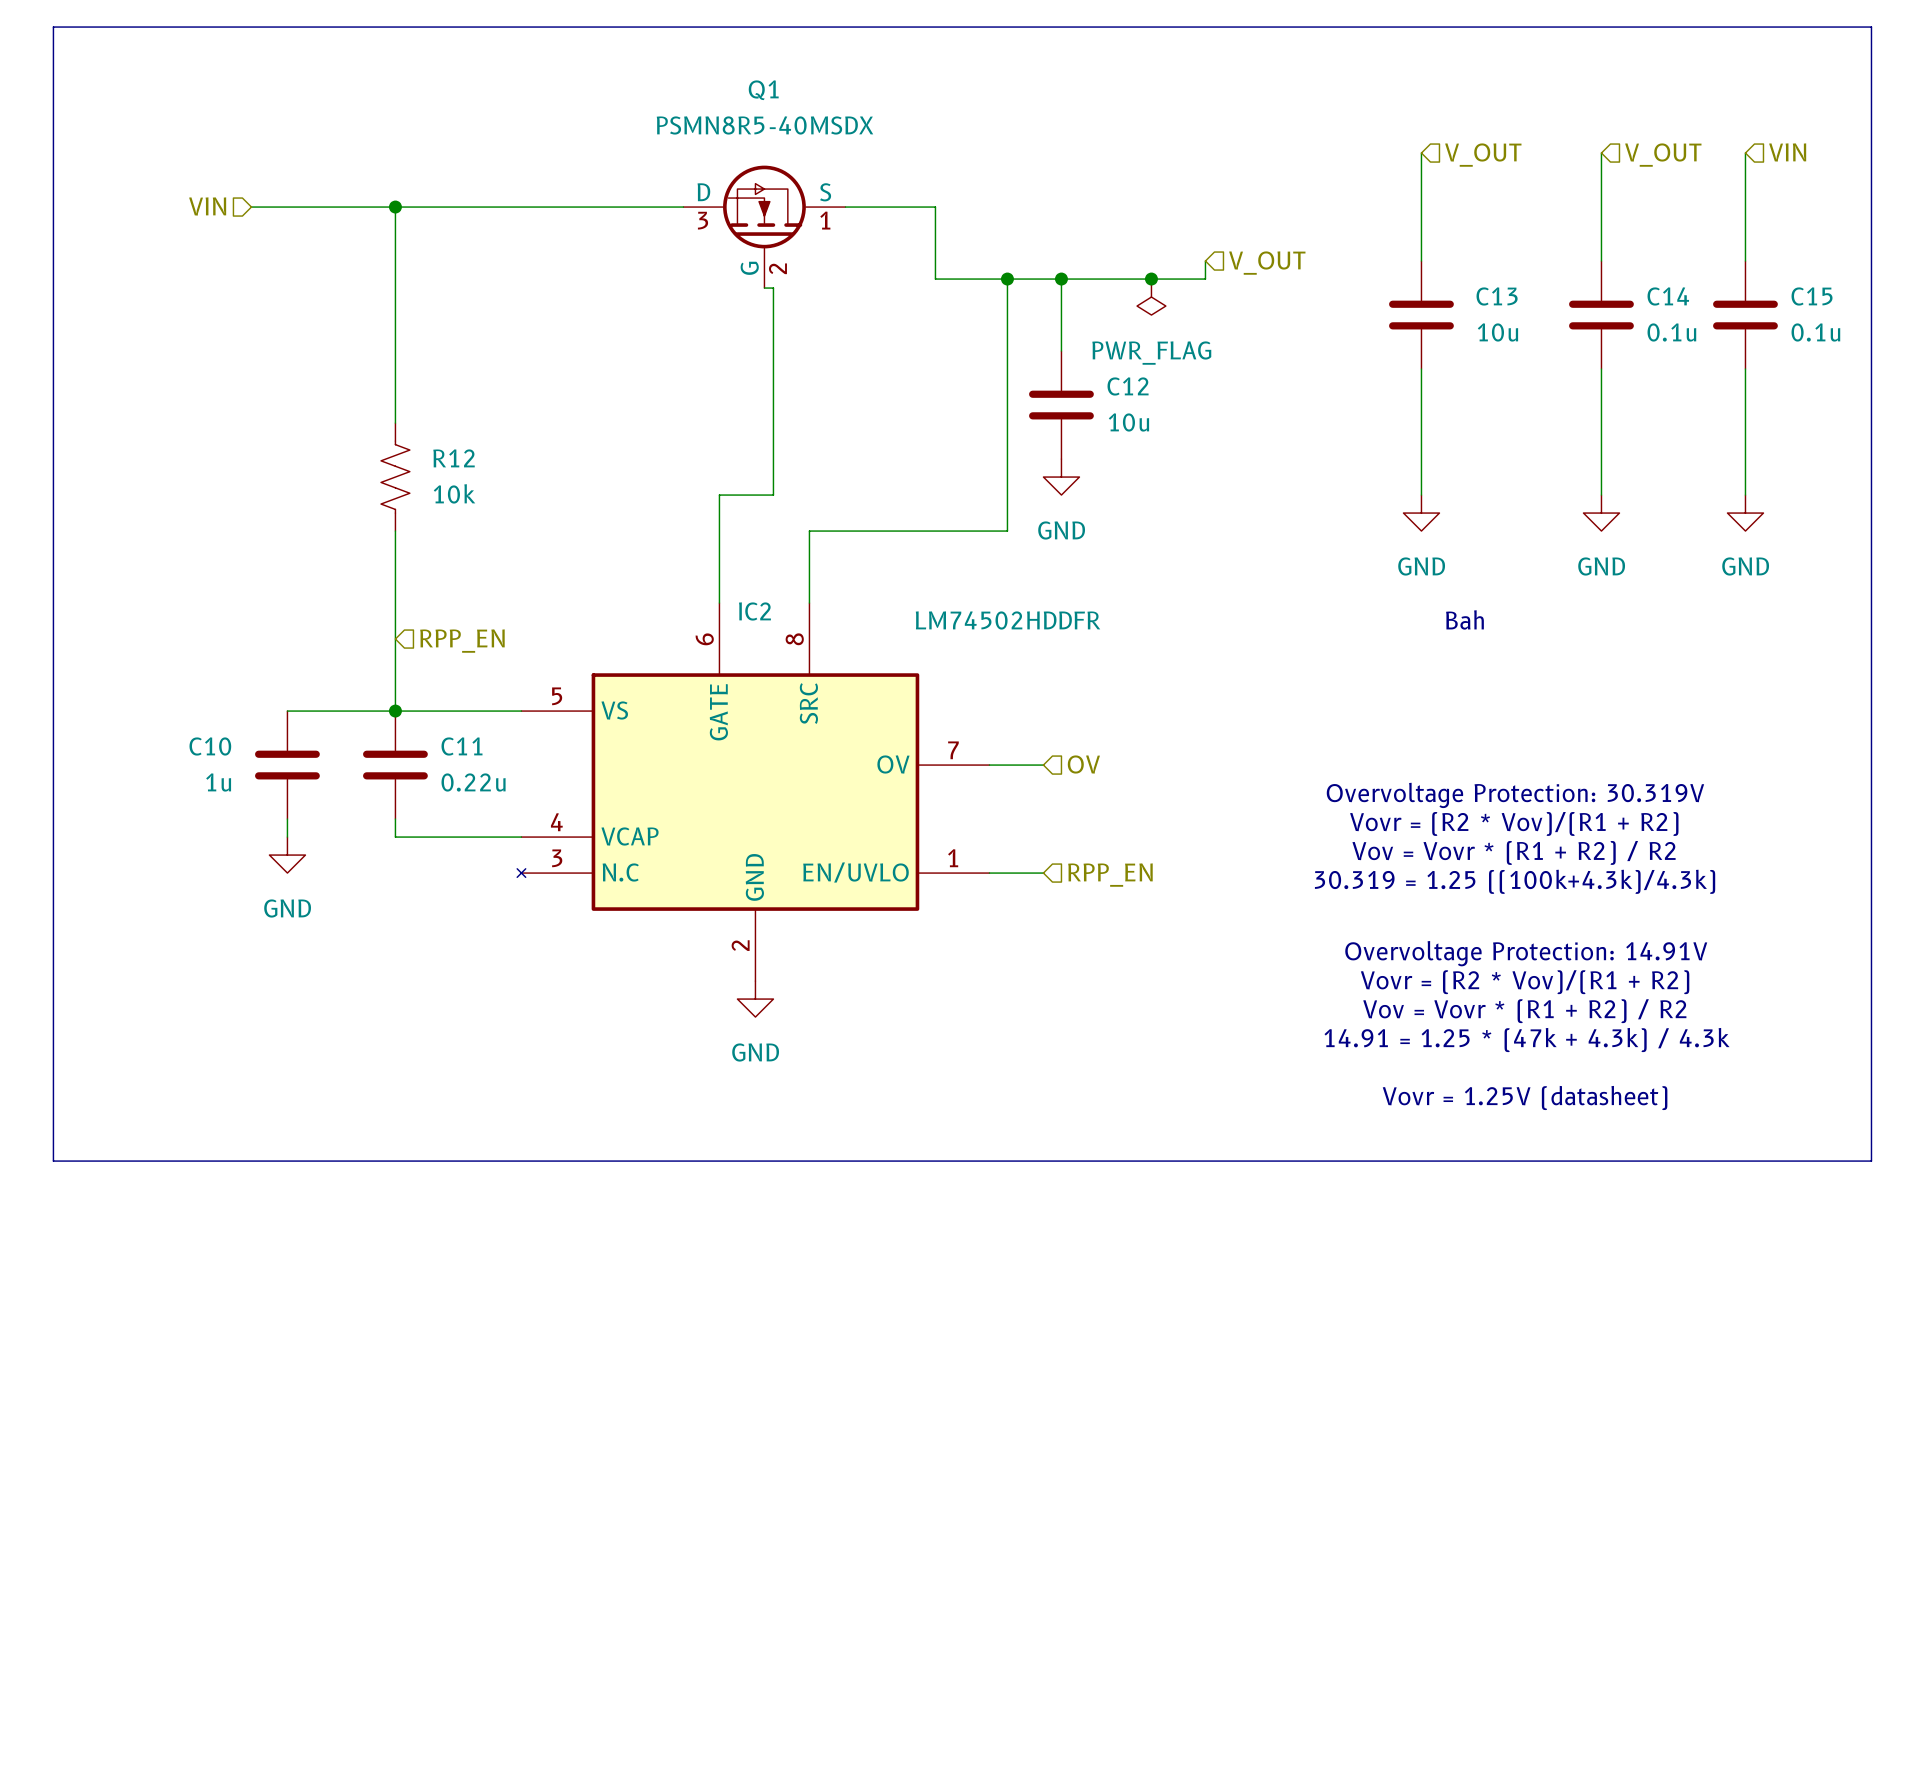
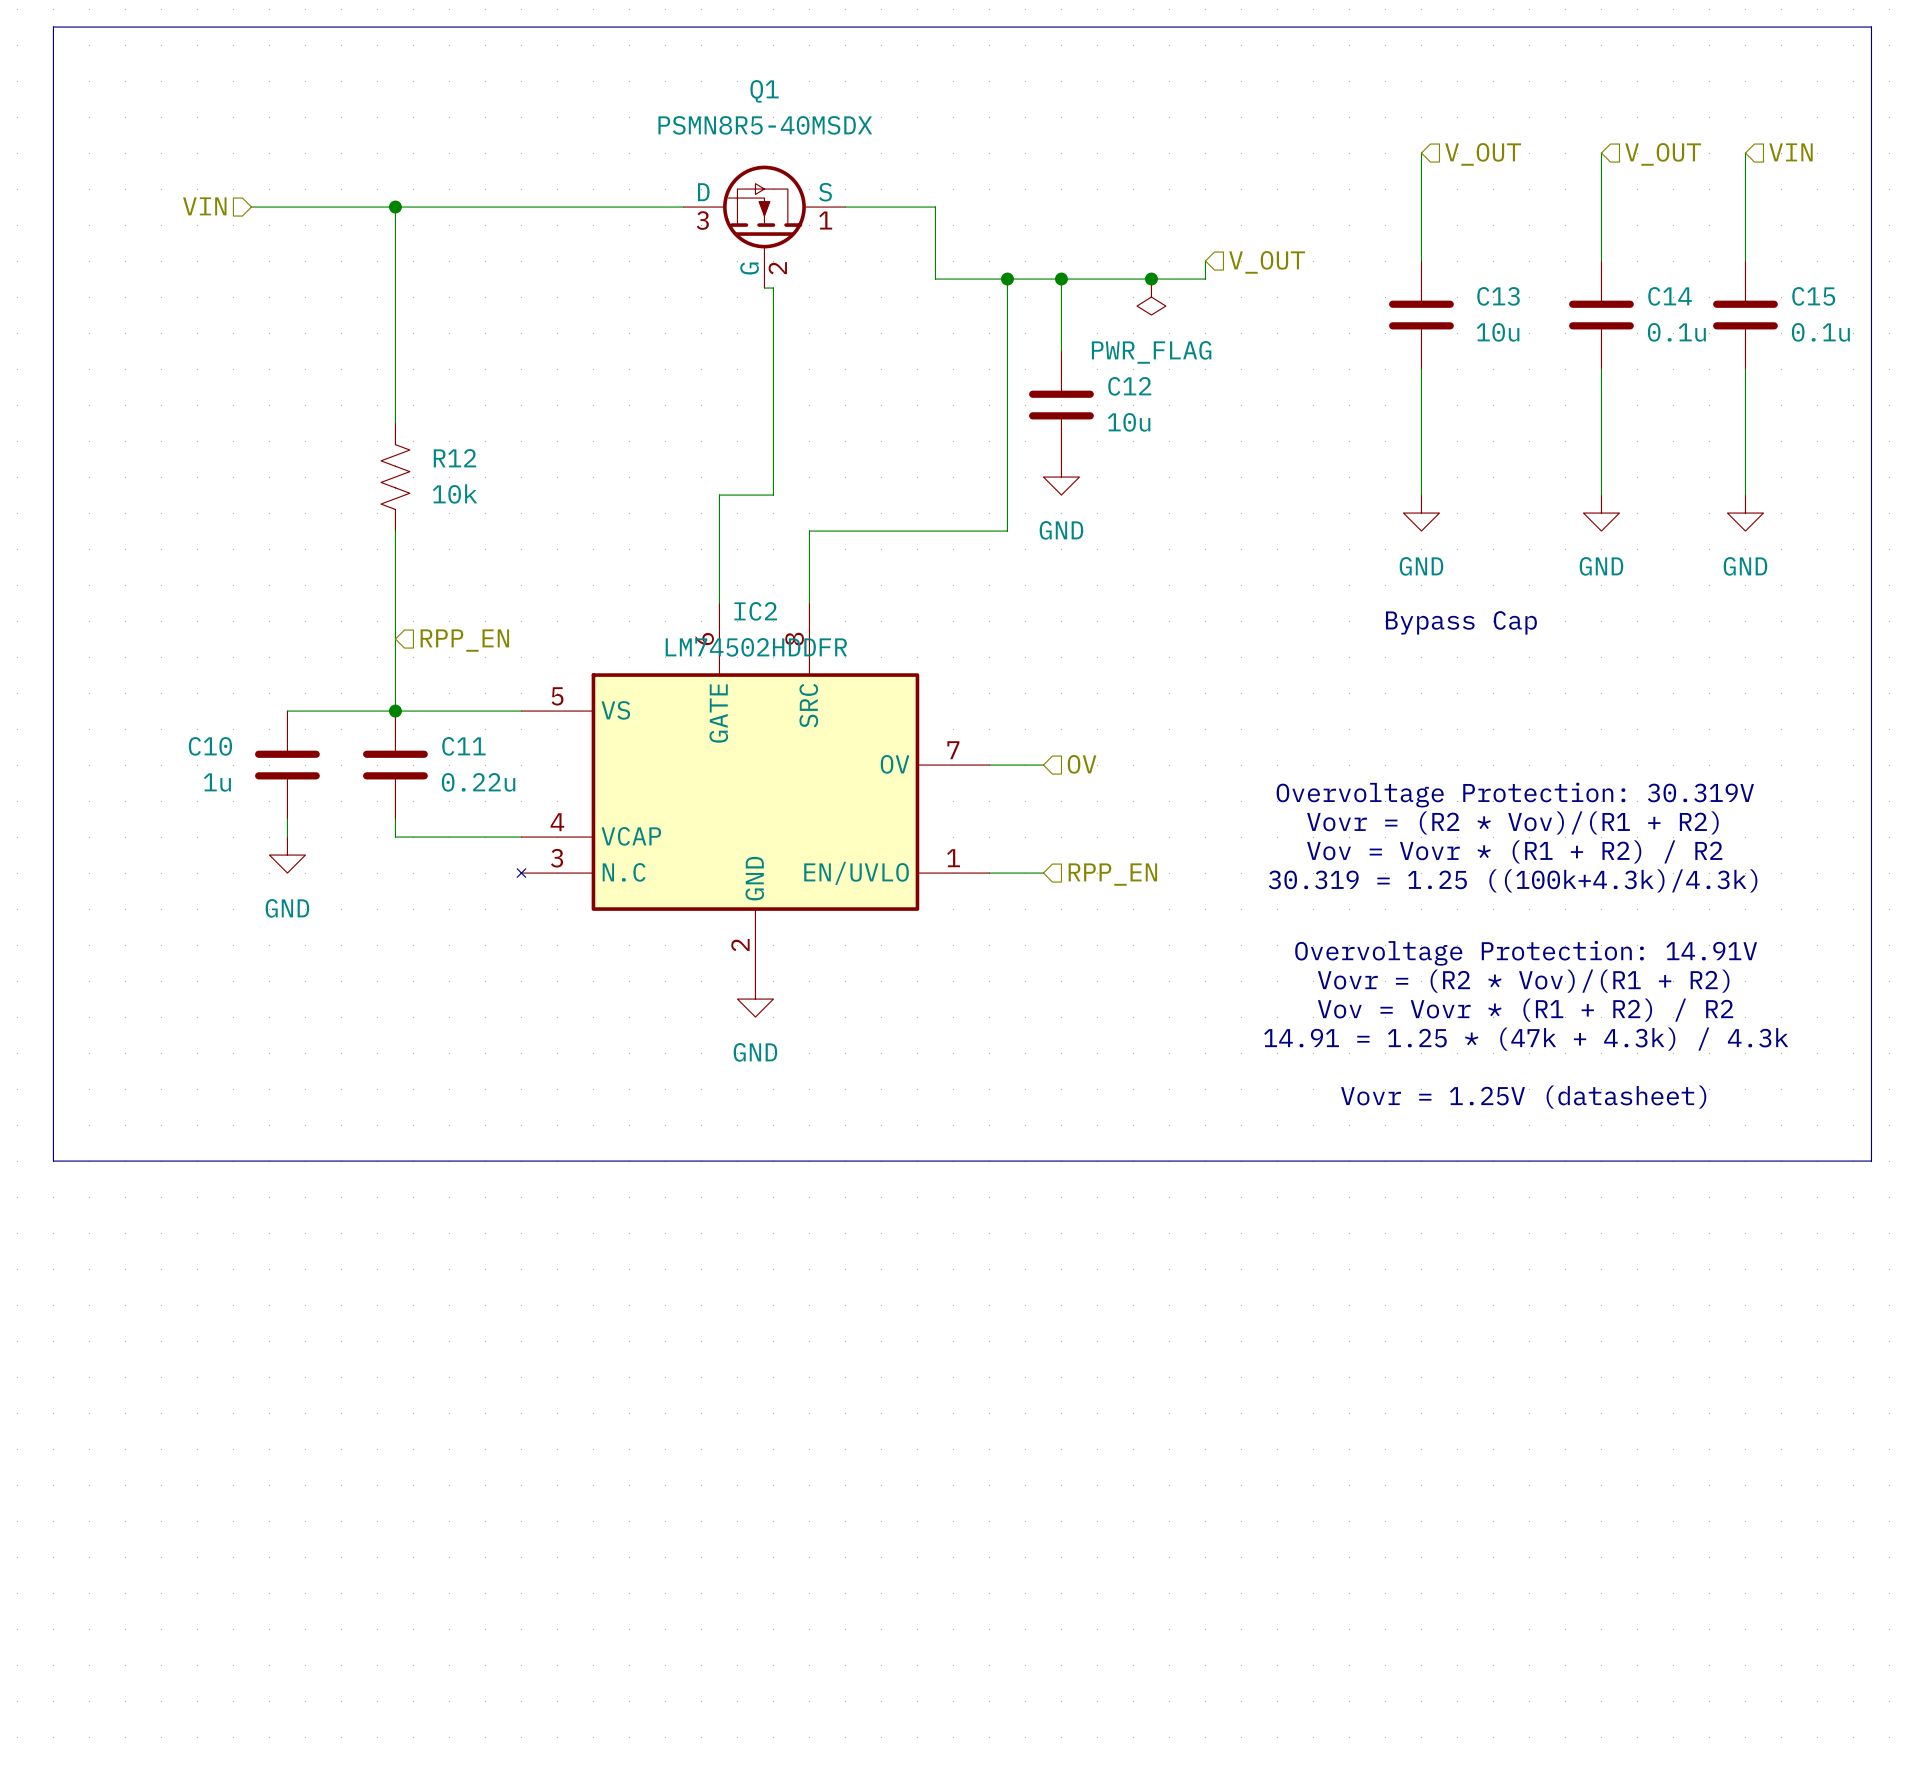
text: Bah (1464, 619) -> Bypass Cap (1461, 622)
IC2 value position: LM74502HDDFR (1008, 620) -> LM74502HDDFR (756, 647)

